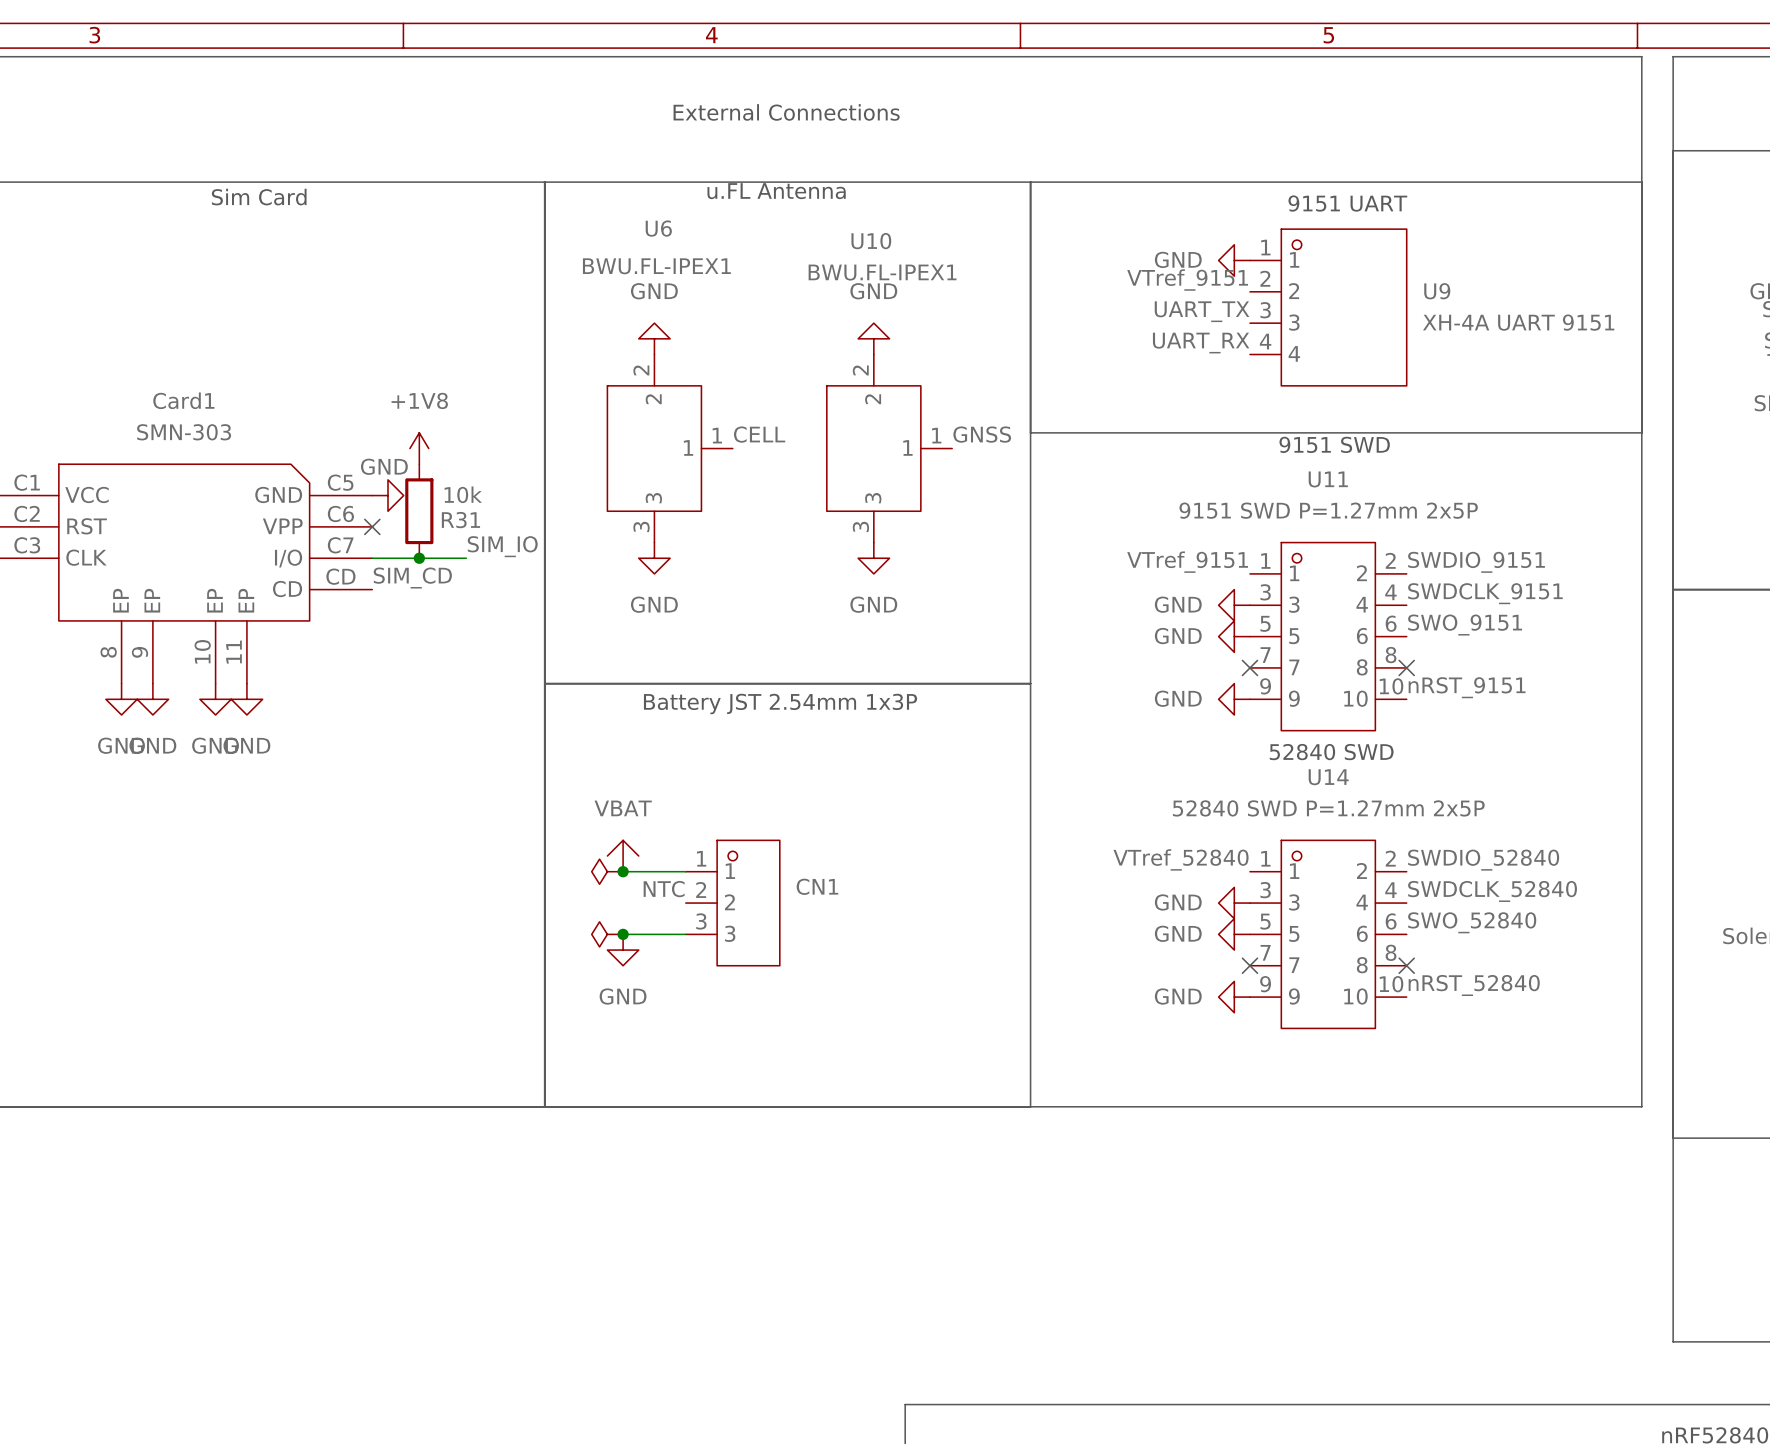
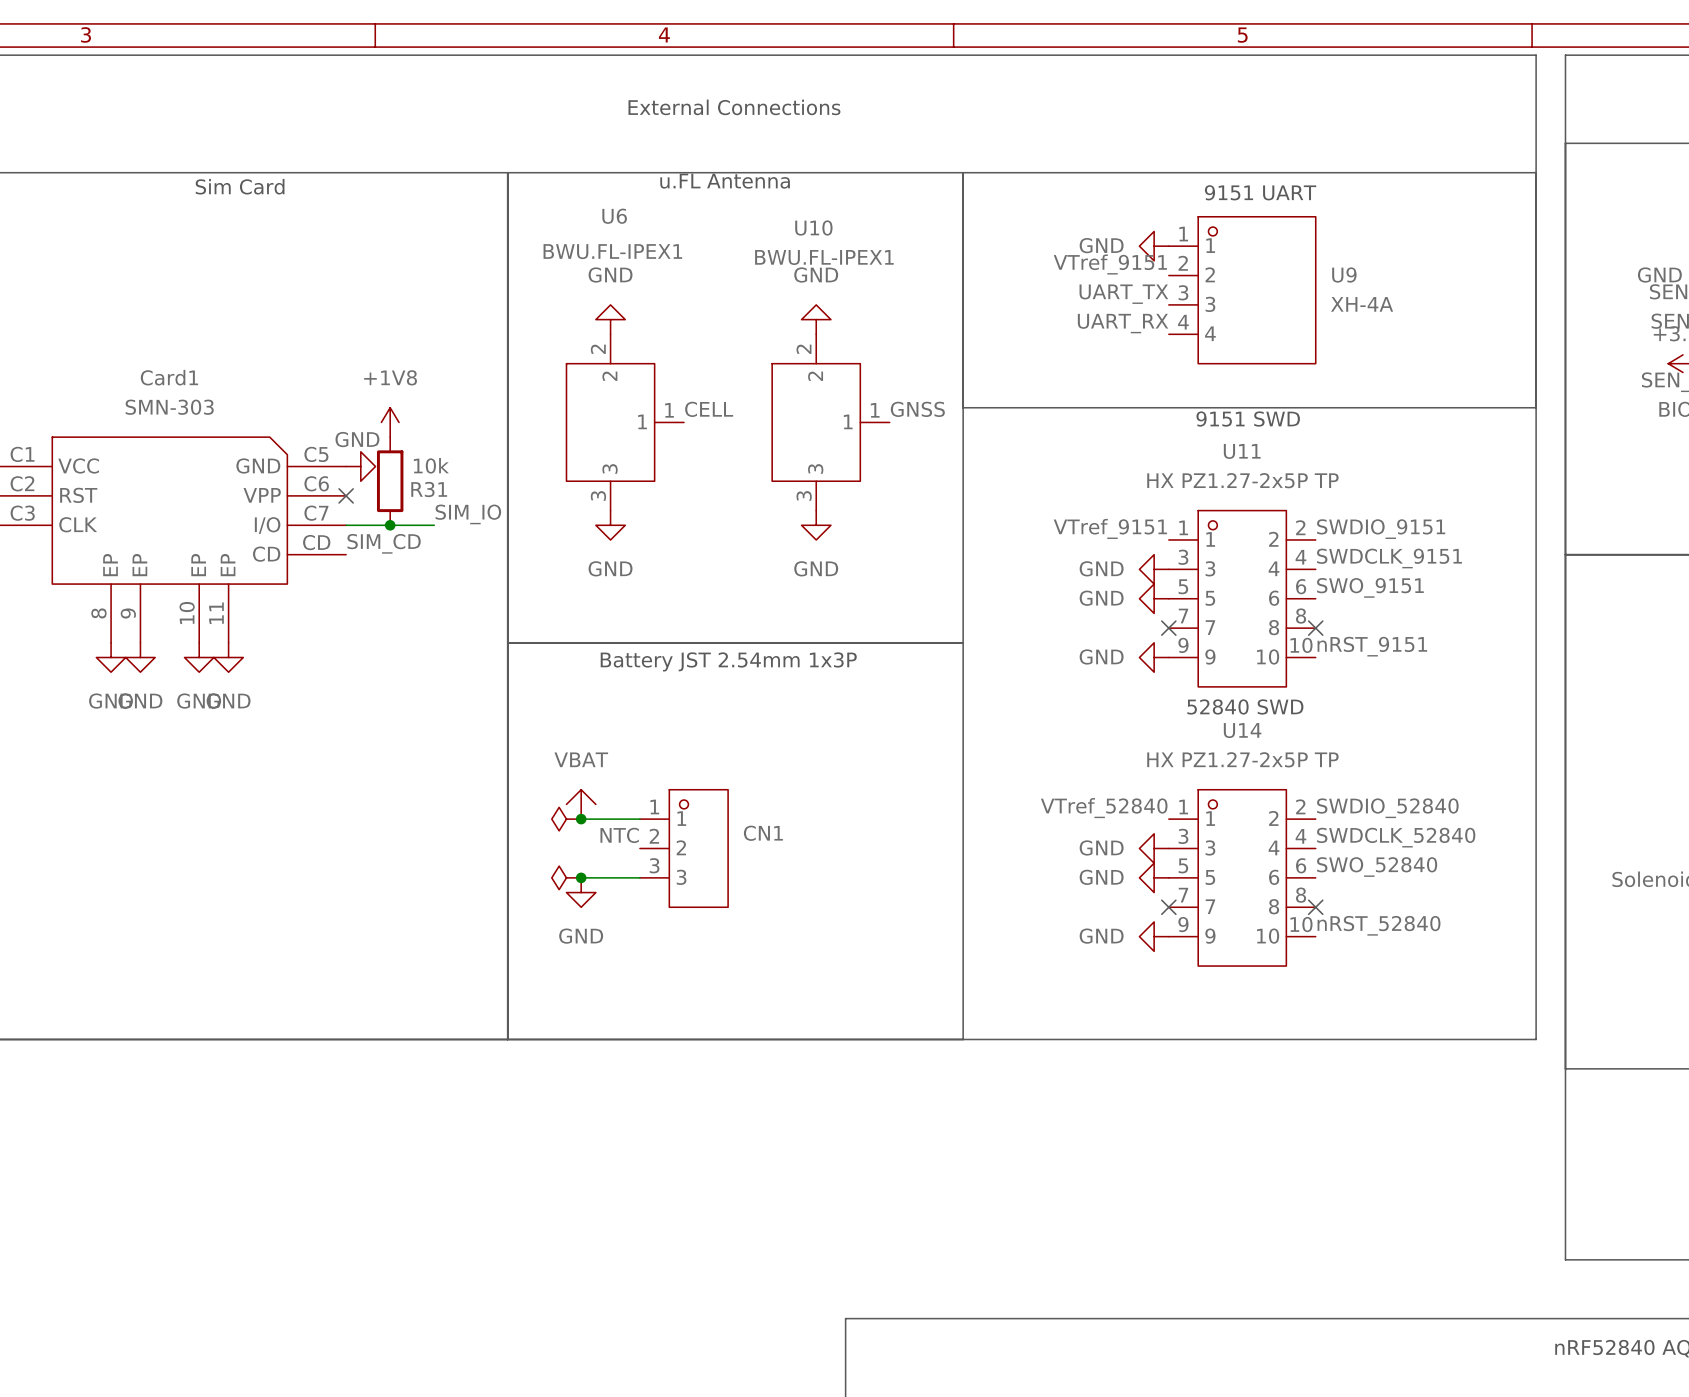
U9 value: XH-4A UART 9151 (1518, 322) -> XH-4A (1362, 304)
U11 value: 9151 SWD P=1.27mm 2x5P (1328, 510) -> HX PZ1.27-2x5P TP (1242, 480)
U14 value: 52840 SWD P=1.27mm 2x5P (1328, 808) -> HX PZ1.27-2x5P TP (1242, 759)

